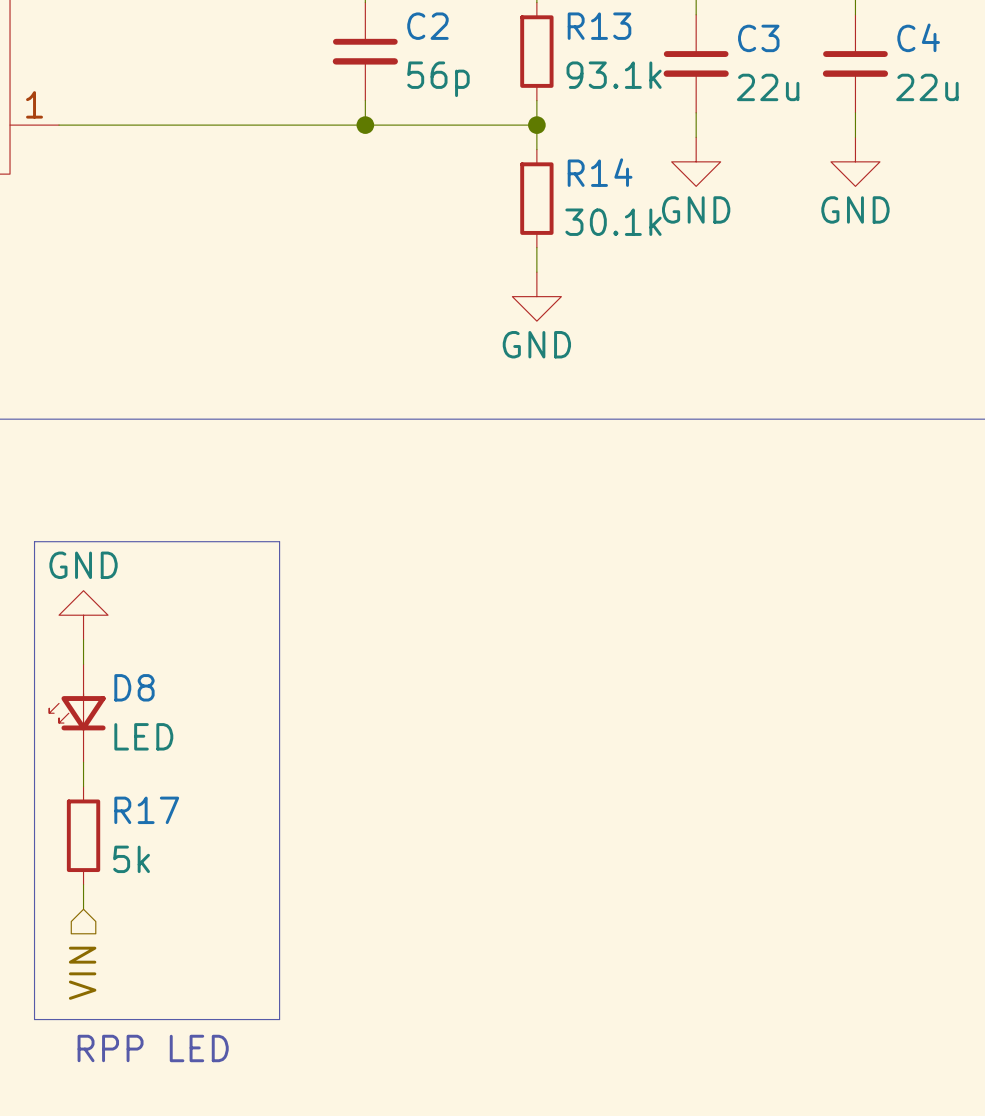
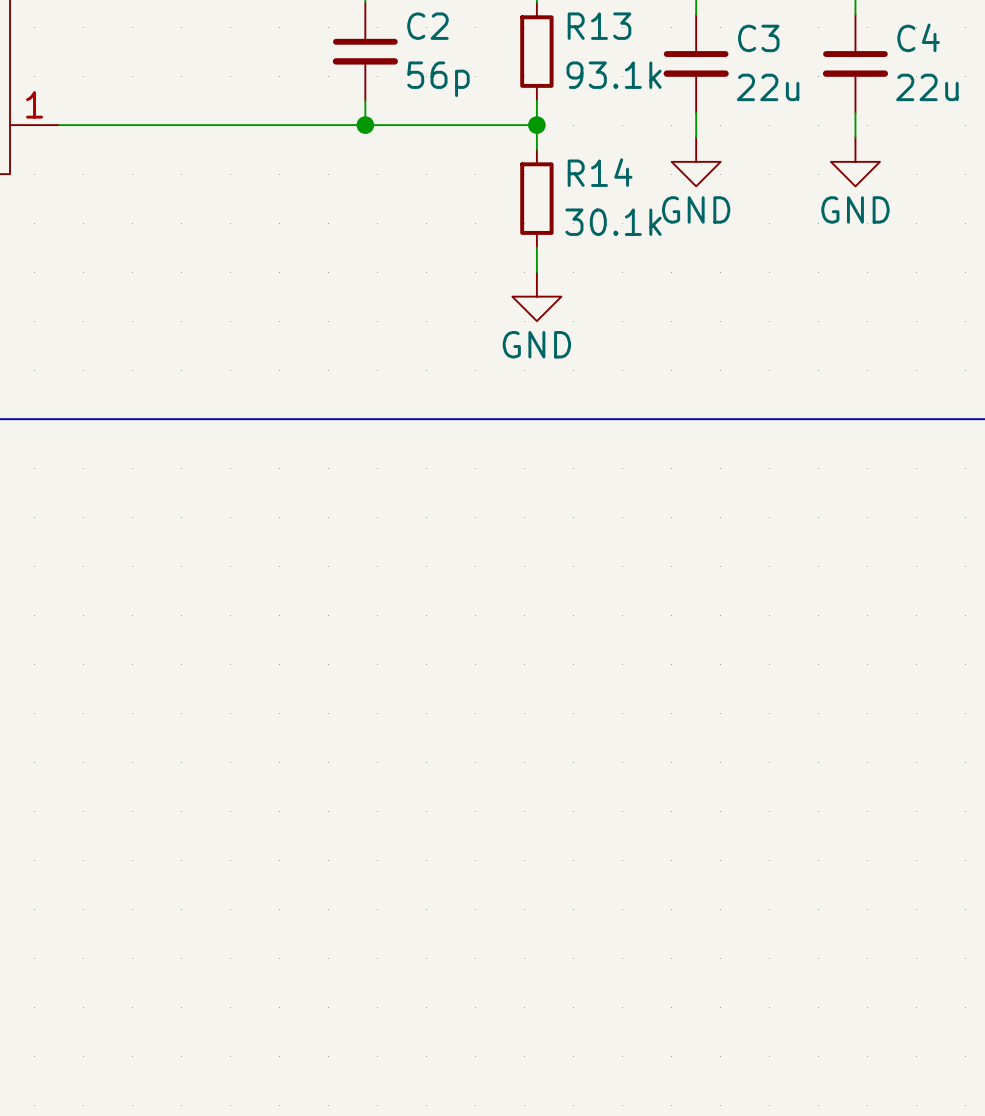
line: (34, 541) (279, 541) (279, 1019) (34, 1019) (34, 541) -> none
power symbol: GND (83, 615) -> none
wire: (83, 639) (83, 664) -> none
D8: LED (77, 713) -> none
wire: (83, 762) (83, 786) -> none
R17: 5k (83, 835) -> none
wire: (83, 884) (83, 909) -> none
hierarchical label: VIN (82, 973) -> none
text: RPP LED (153, 1048) -> none

